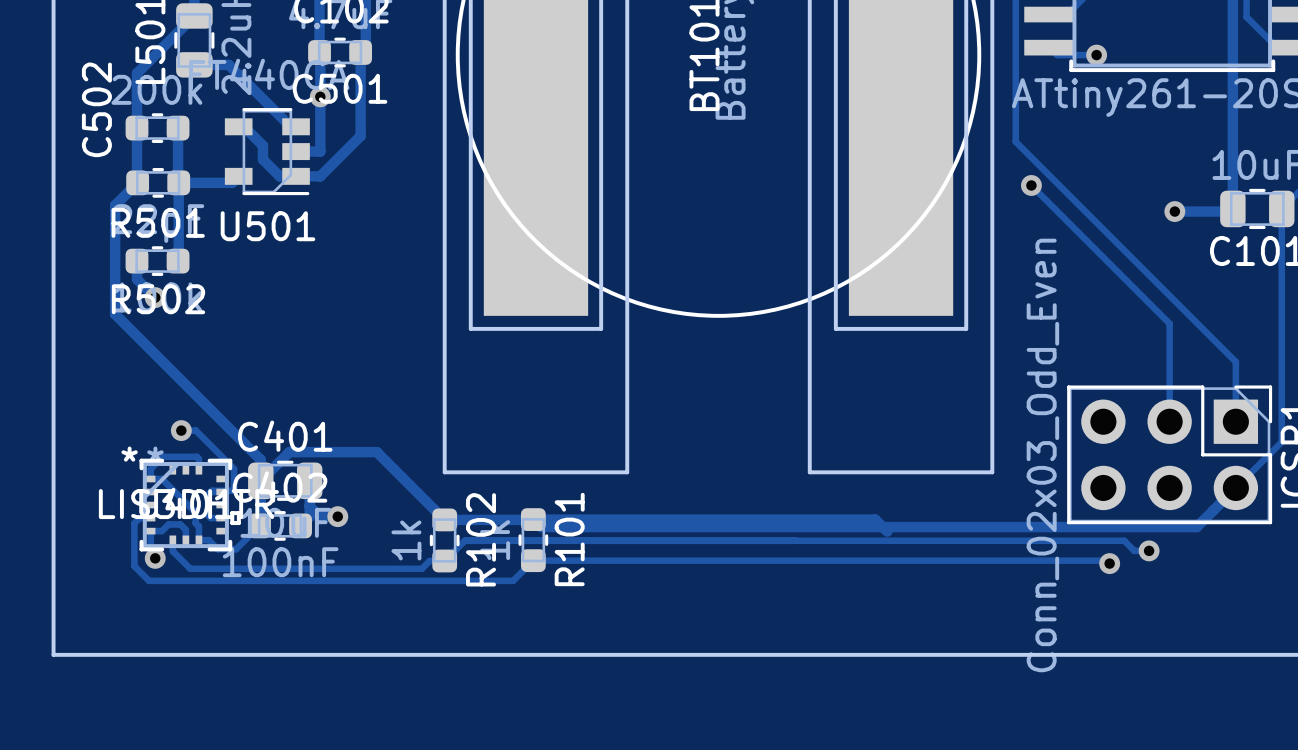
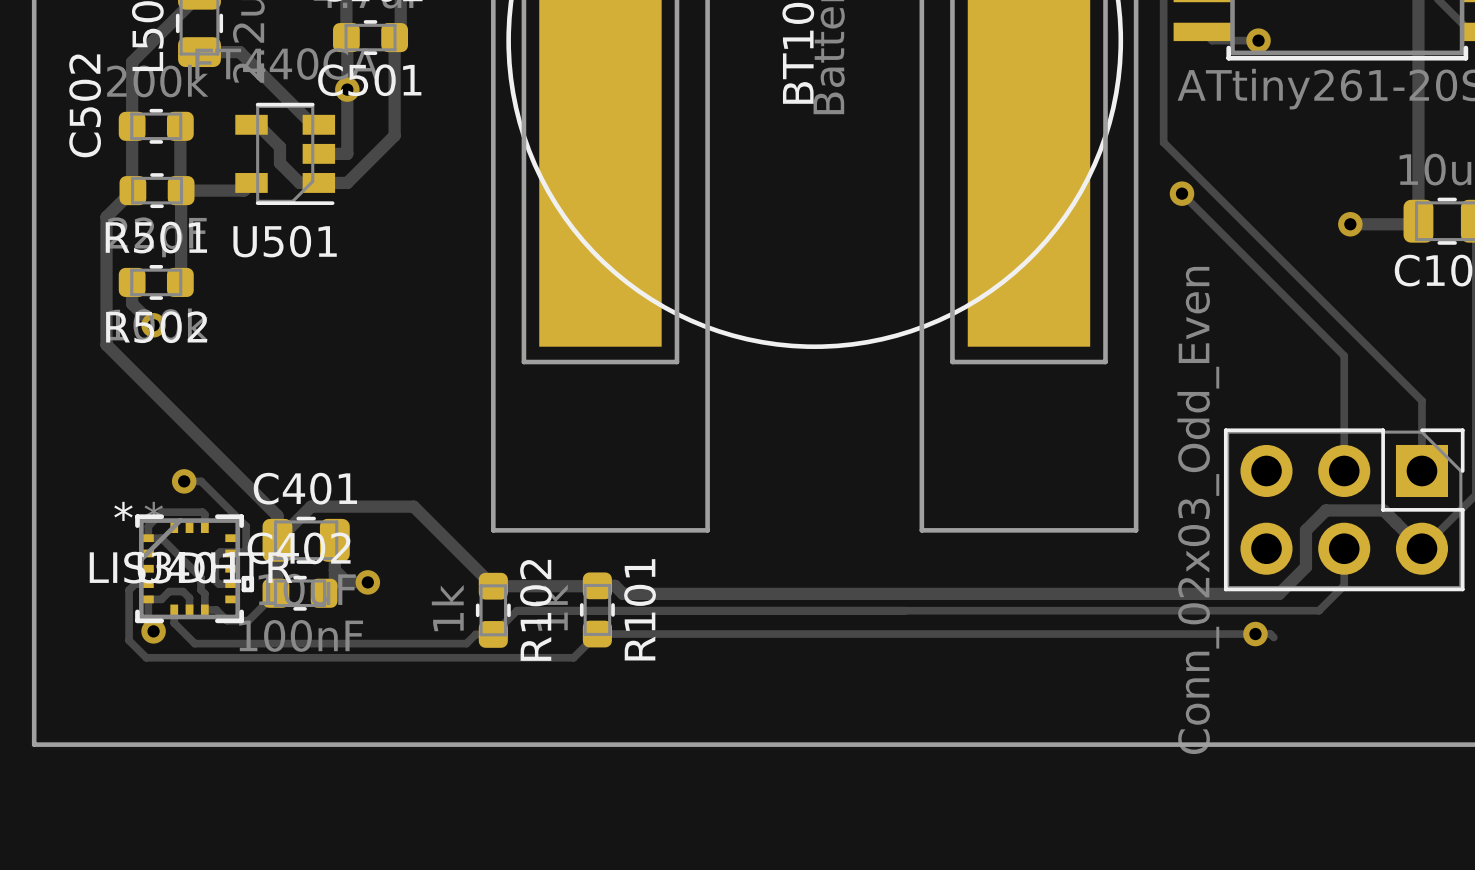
track: (1235, 487) (1196, 527) (540, 527) (533, 519) -> (1421, 548) (1383, 510) (1325, 510) (1305, 530) (1305, 567) (1279, 593) (623, 593) (615, 585)
track: (548, 519) (875, 519) (887, 531) -> none
track: (1124, 540) (1134, 550) (1149, 550) -> (1290, 610) (1319, 610) (1344, 585) (1344, 548)
via: (1149, 550) -> none
via position: (1109, 563) -> (1255, 634)

